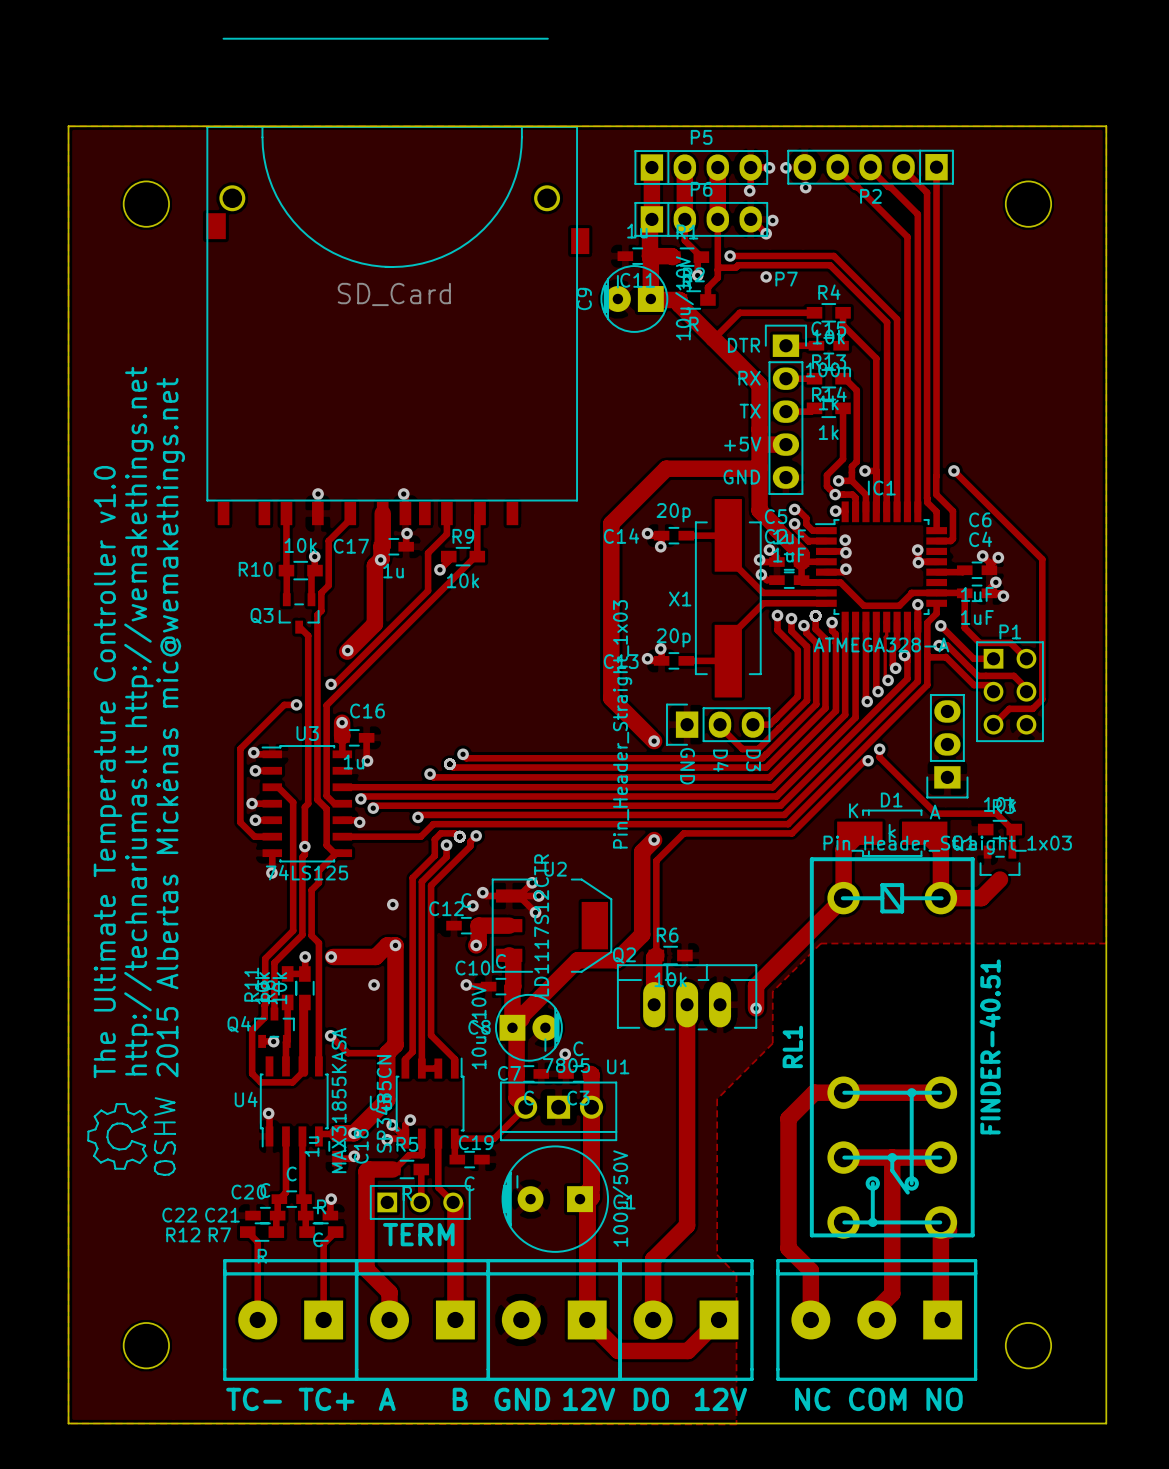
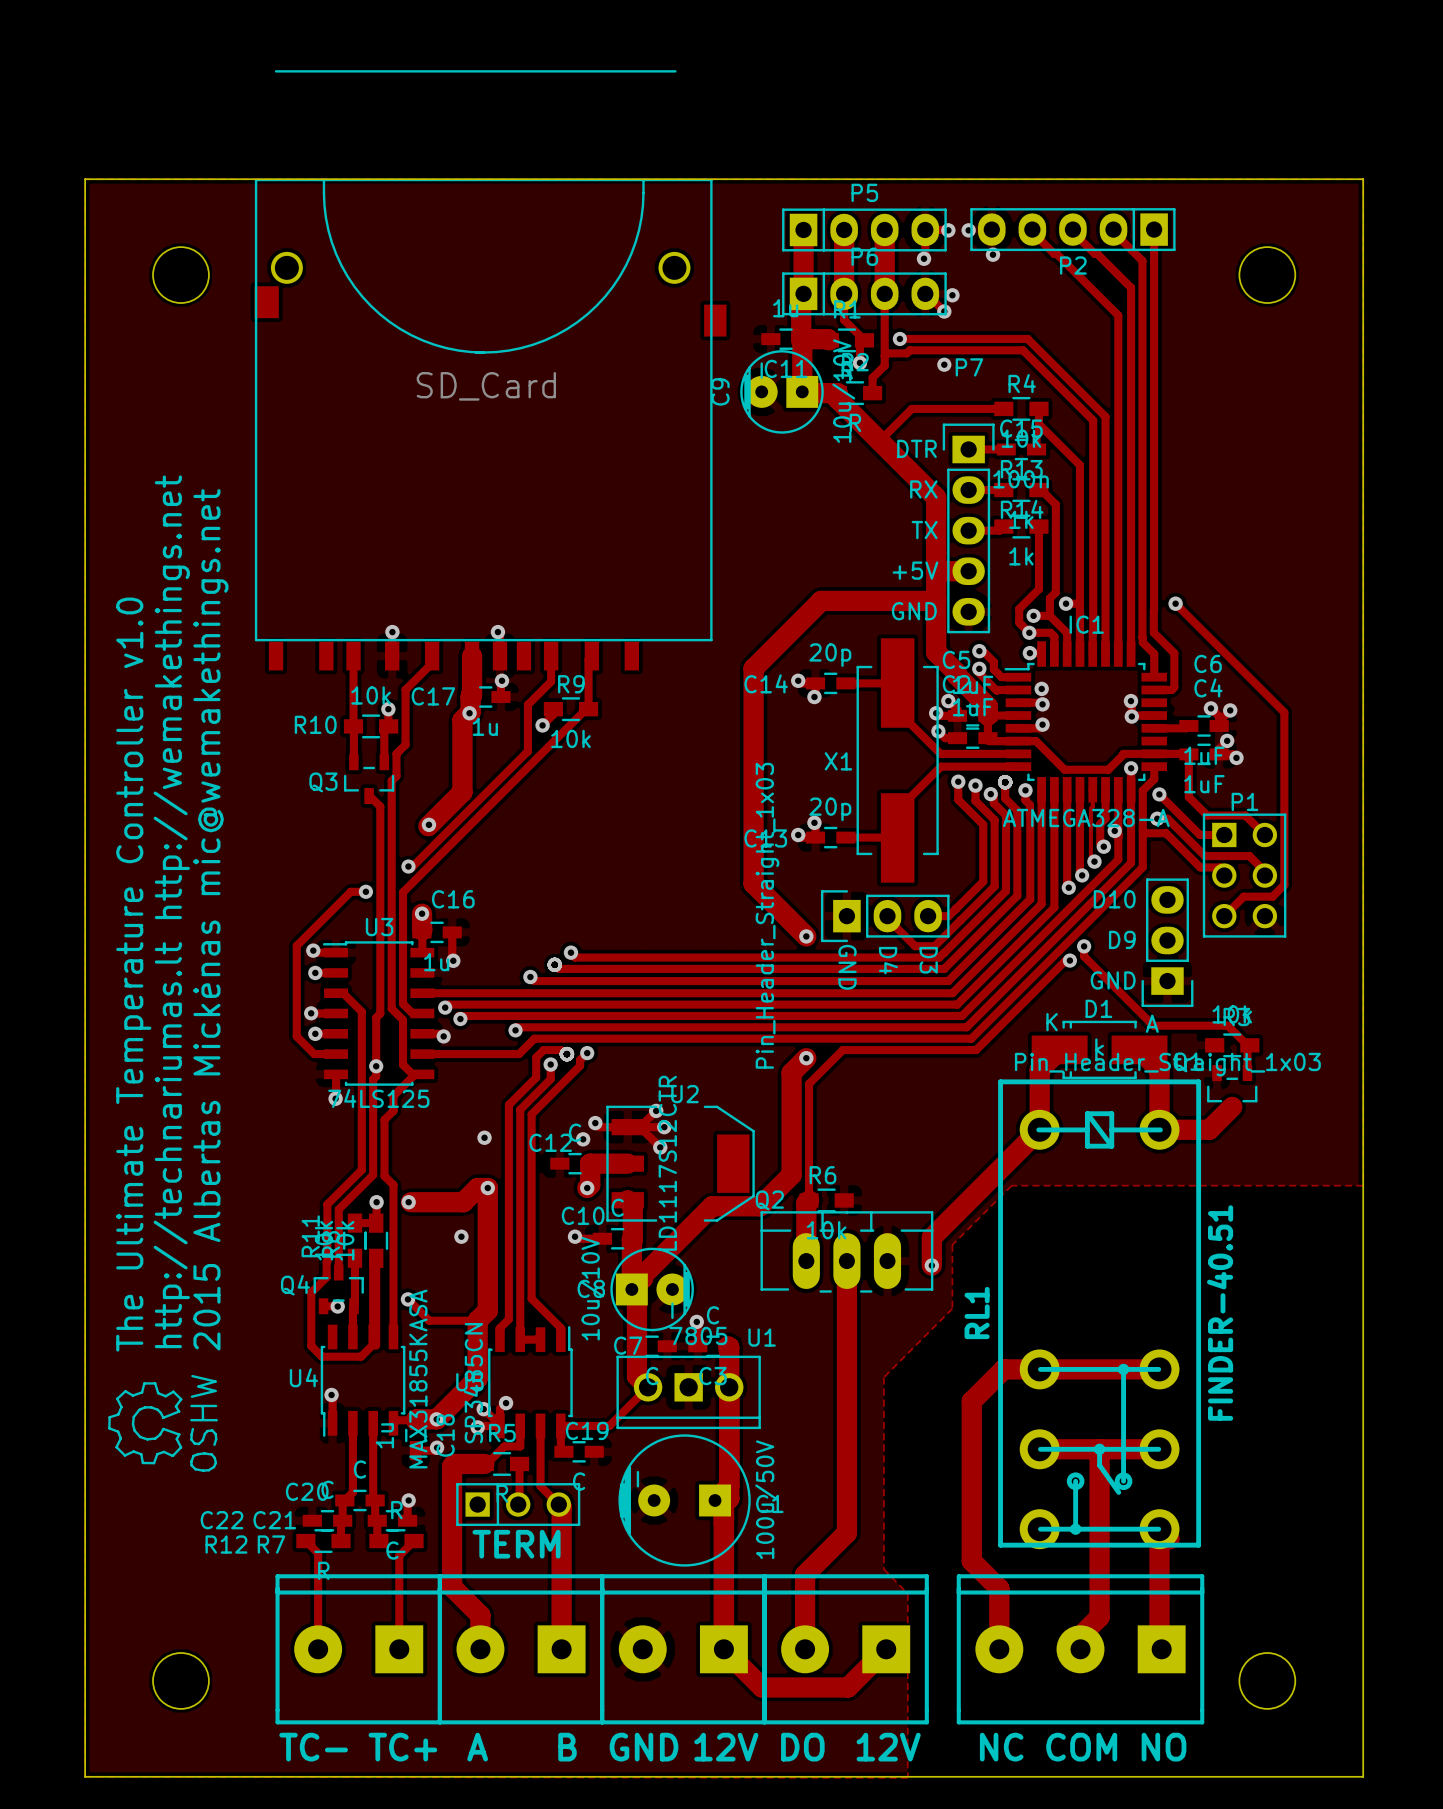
text: none -> D10 (1114, 899)
text: none -> D9 (1122, 939)
text: none -> GND (1113, 980)

